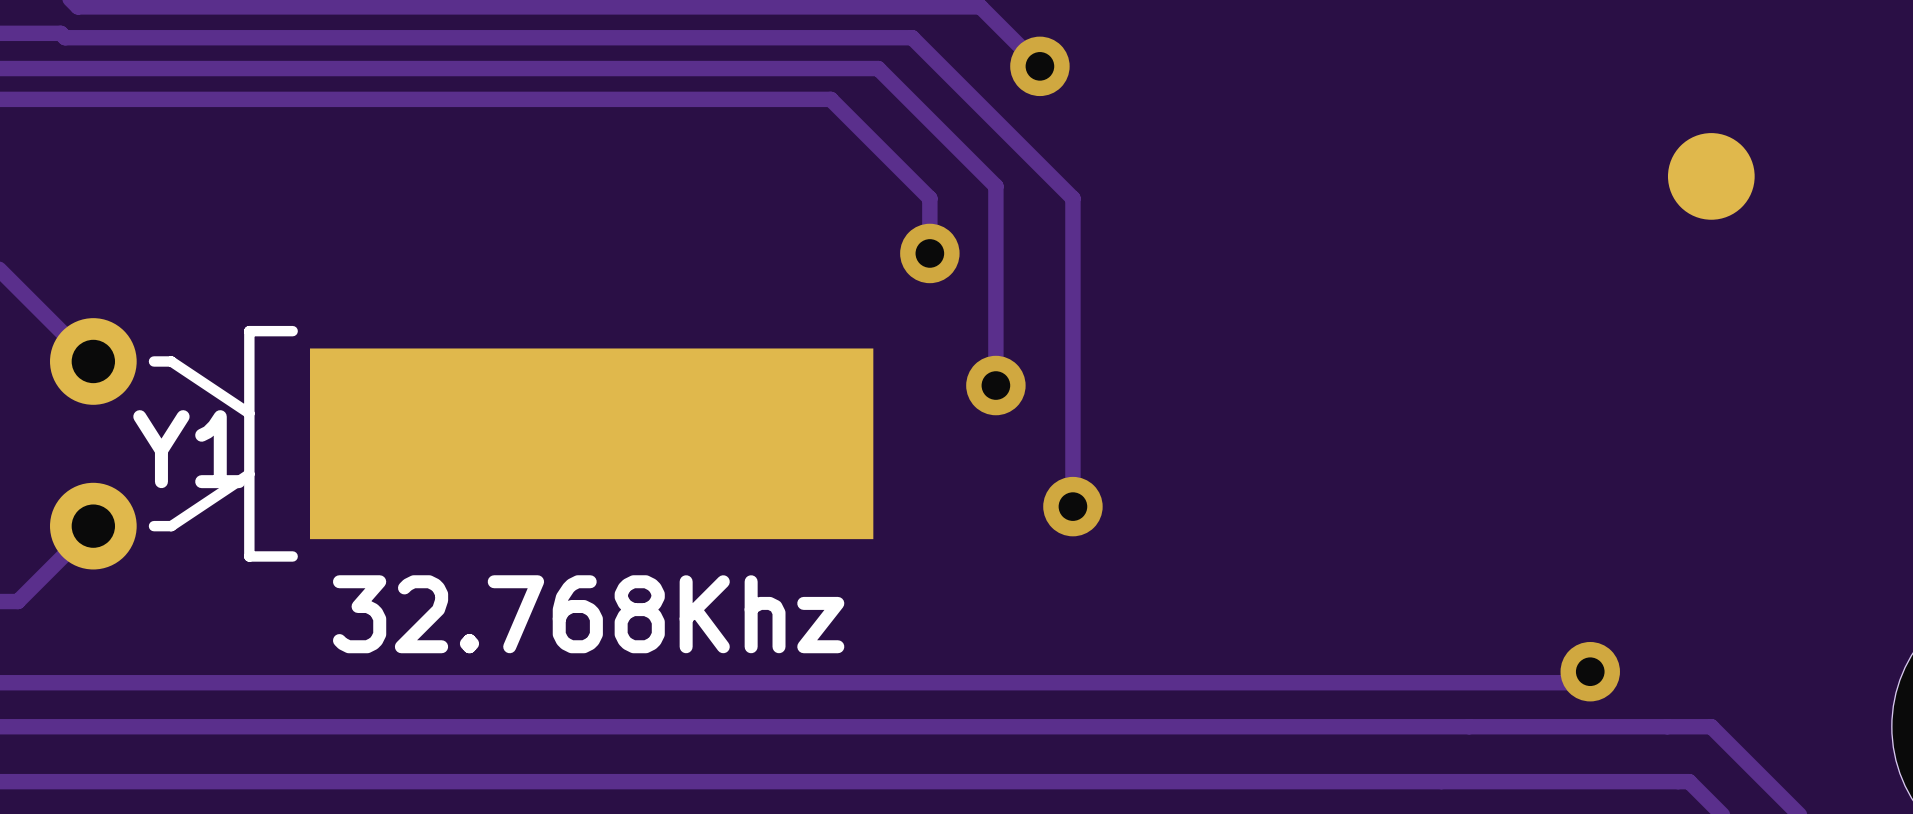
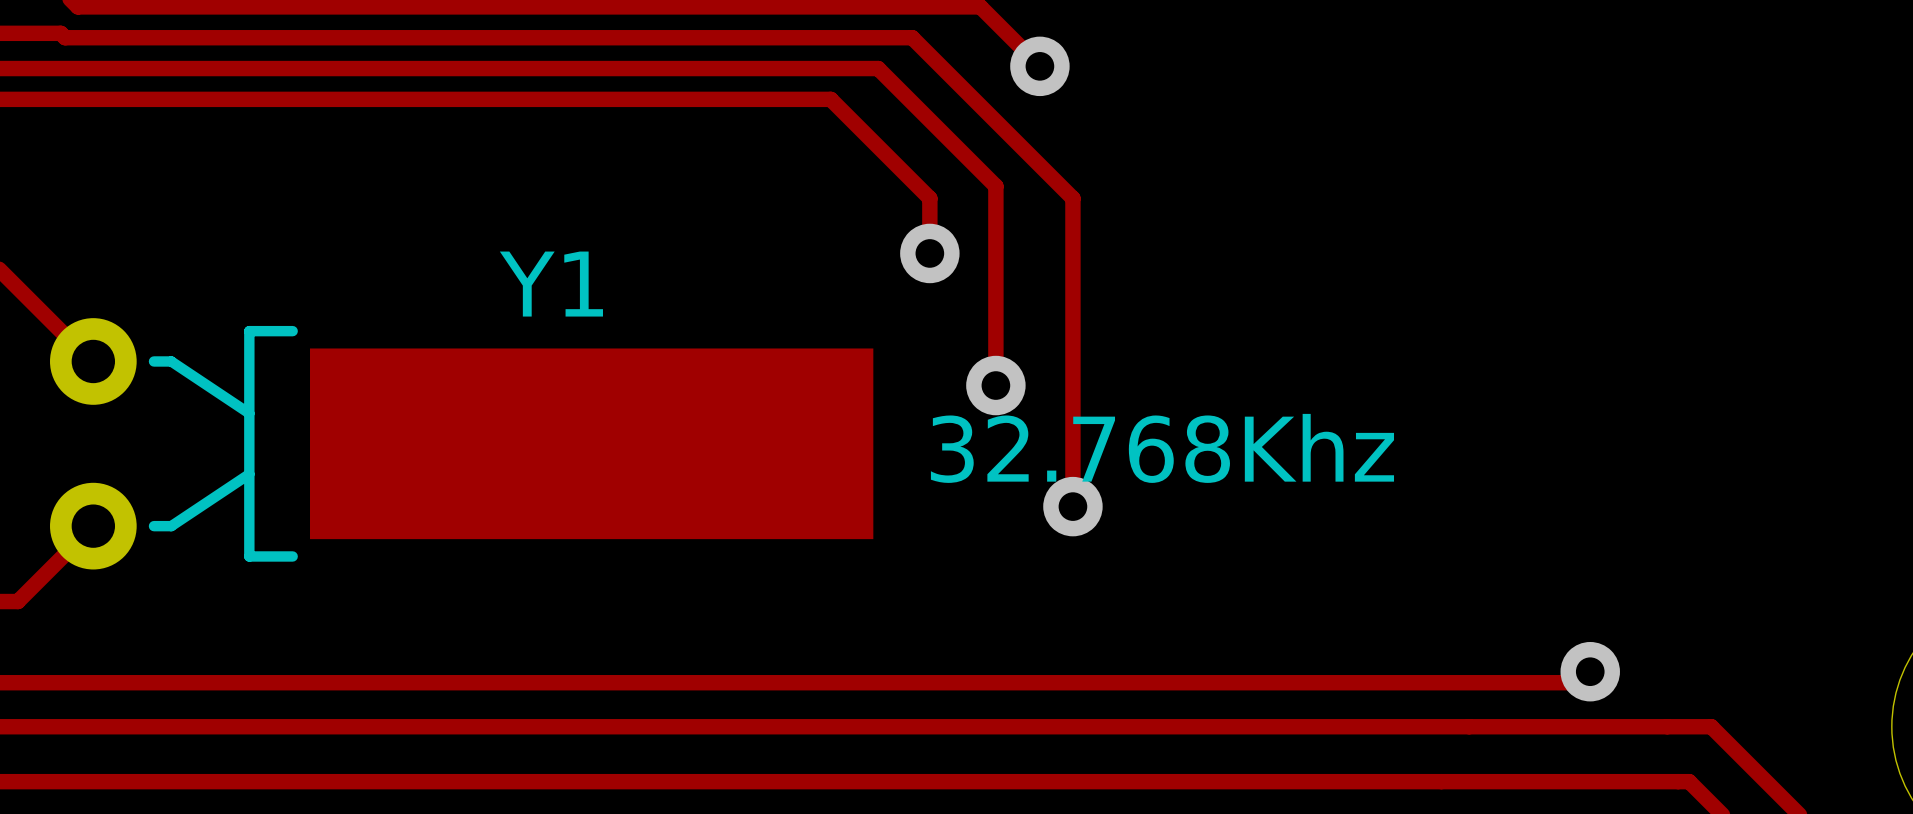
part: (1711, 176) -> none
Y1 name position: Y1 (189, 449) -> Y1 (551, 284)
Y1 value position: 32.768Khz (588, 614) -> 32.768Khz (1162, 448)

